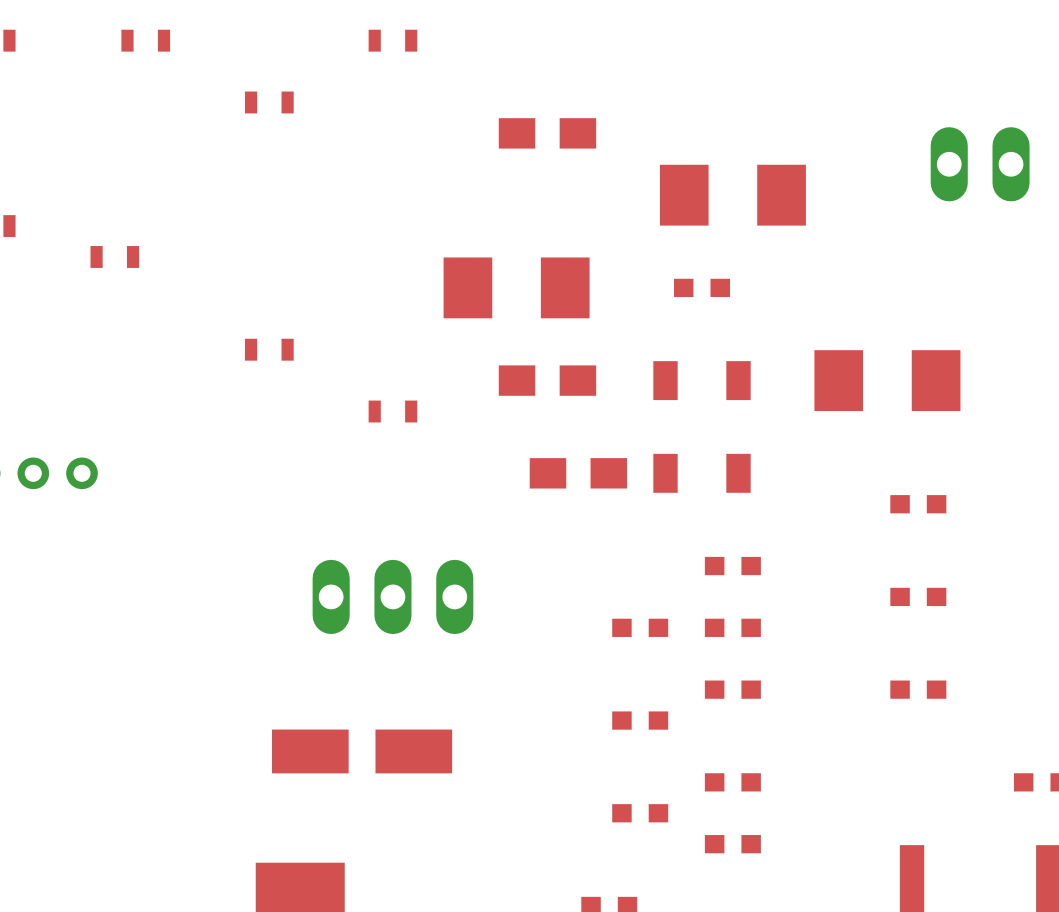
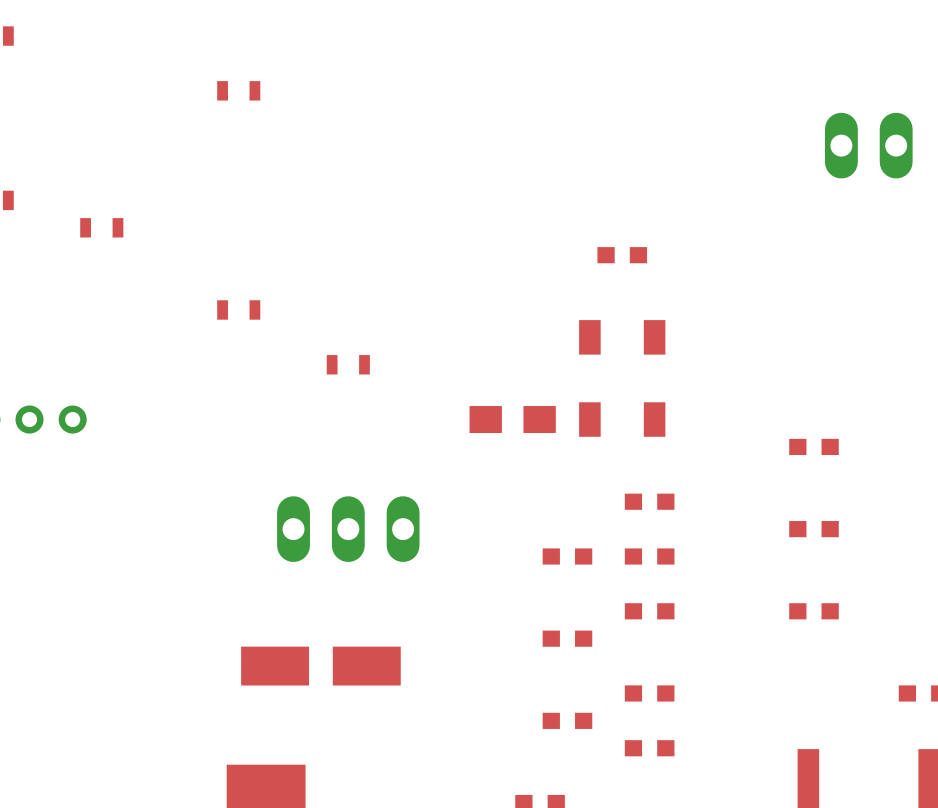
part: (145, 40) -> none
part: (392, 40) -> none
part: (547, 133) -> none
part: (732, 195) -> none
part: (516, 287) -> none
part: (547, 380) -> none
part: (887, 380) -> none

